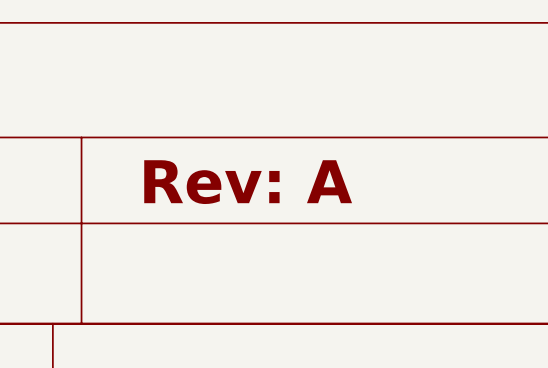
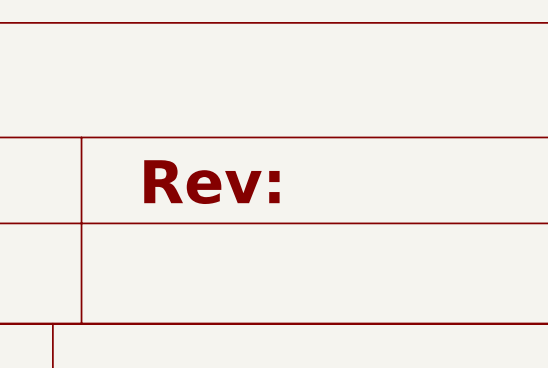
title block: Rev: A (248, 182) -> Rev: (211, 182)

